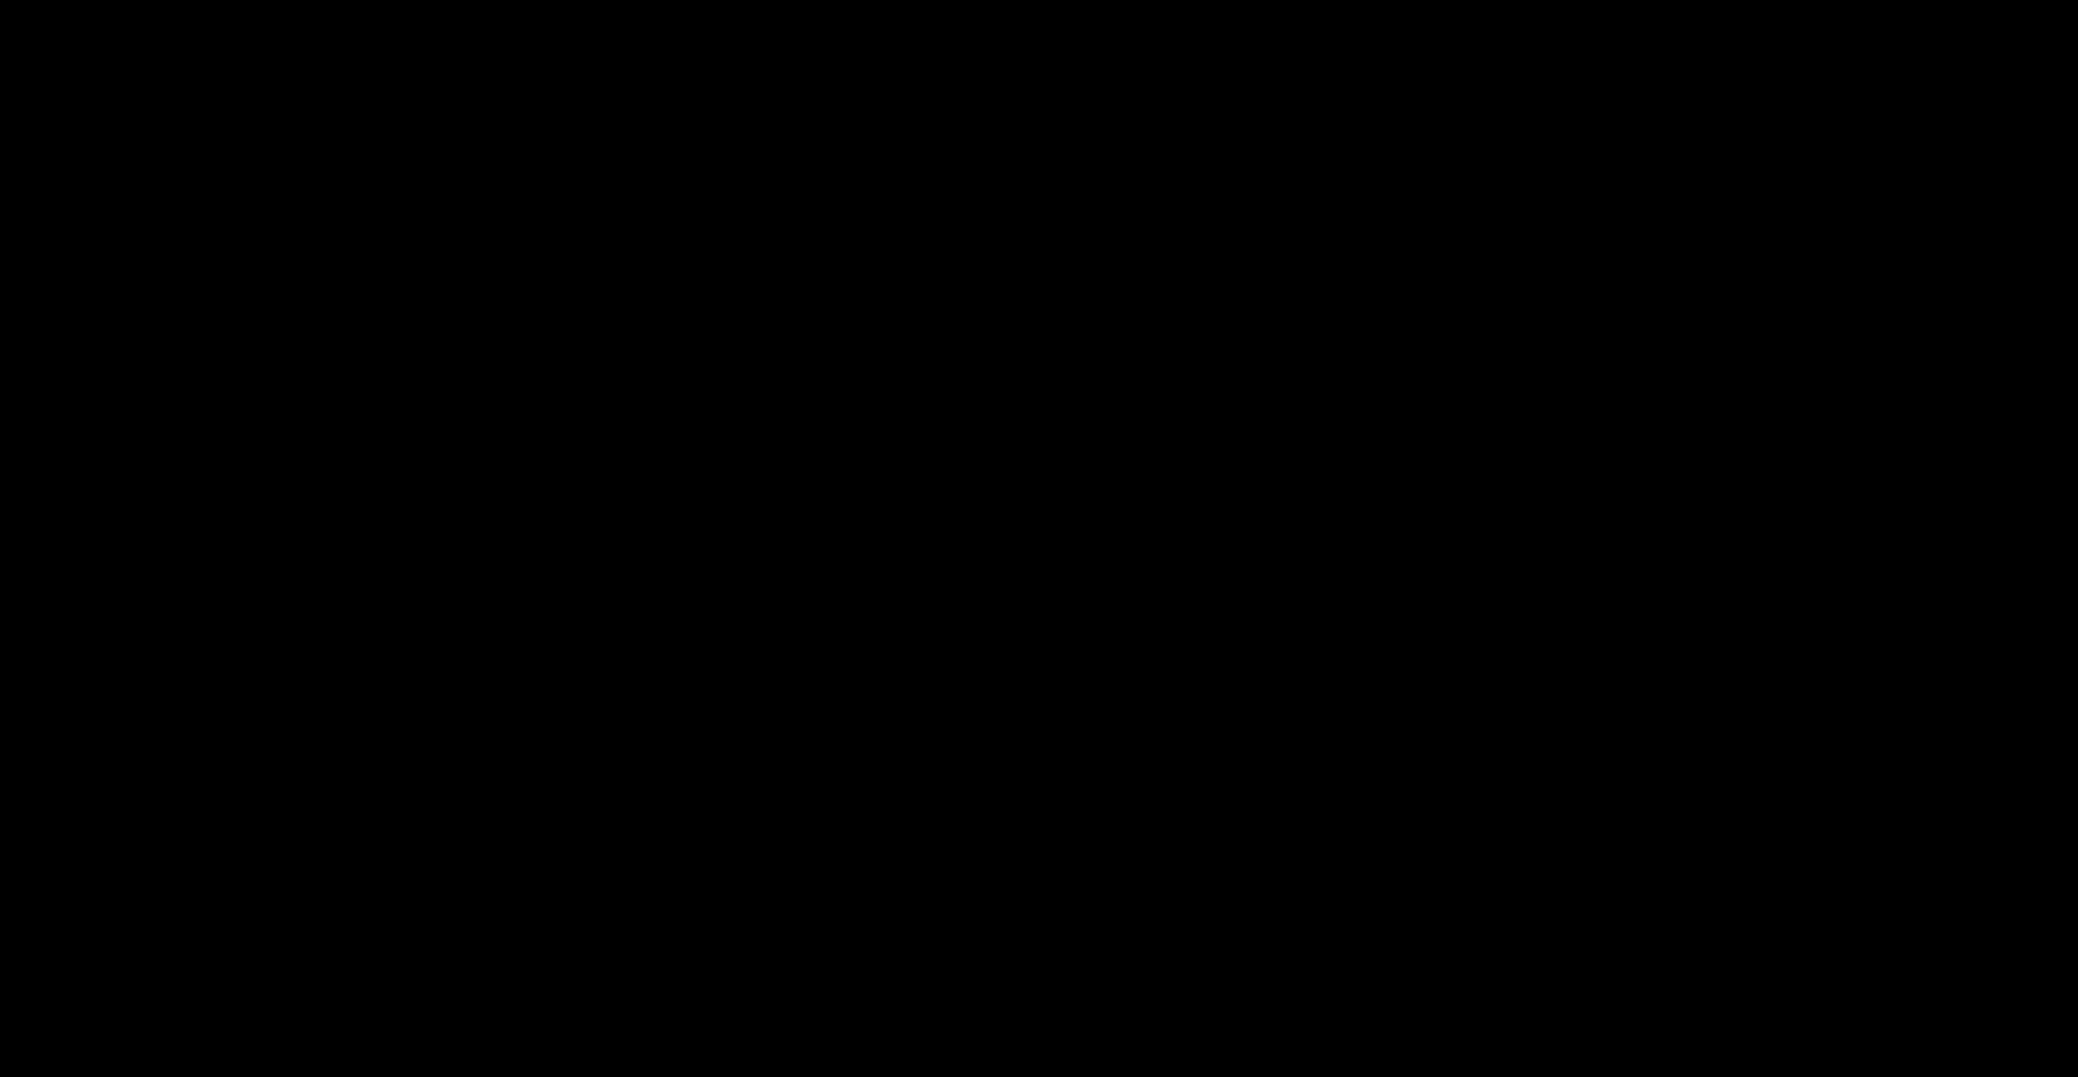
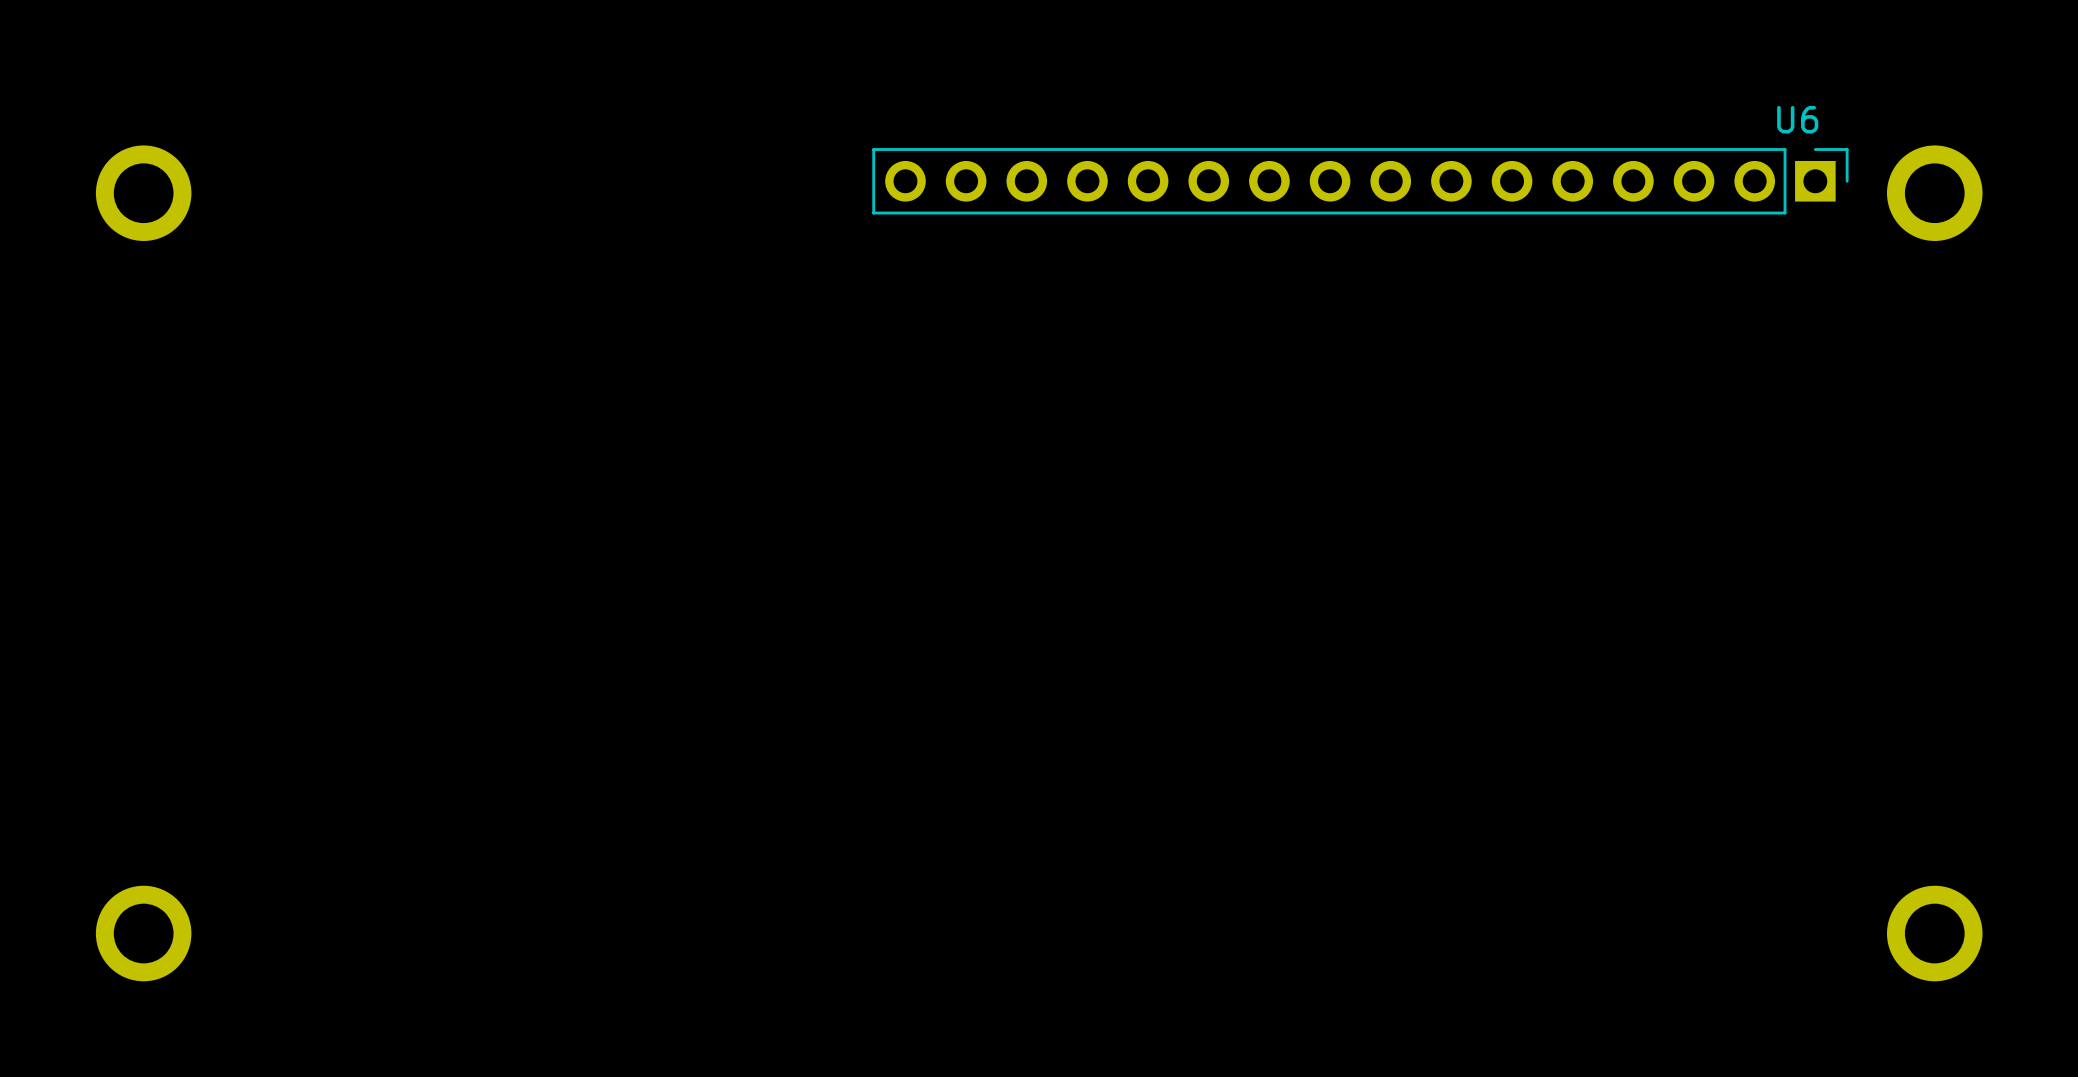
U6: none -> (1039, 563)

